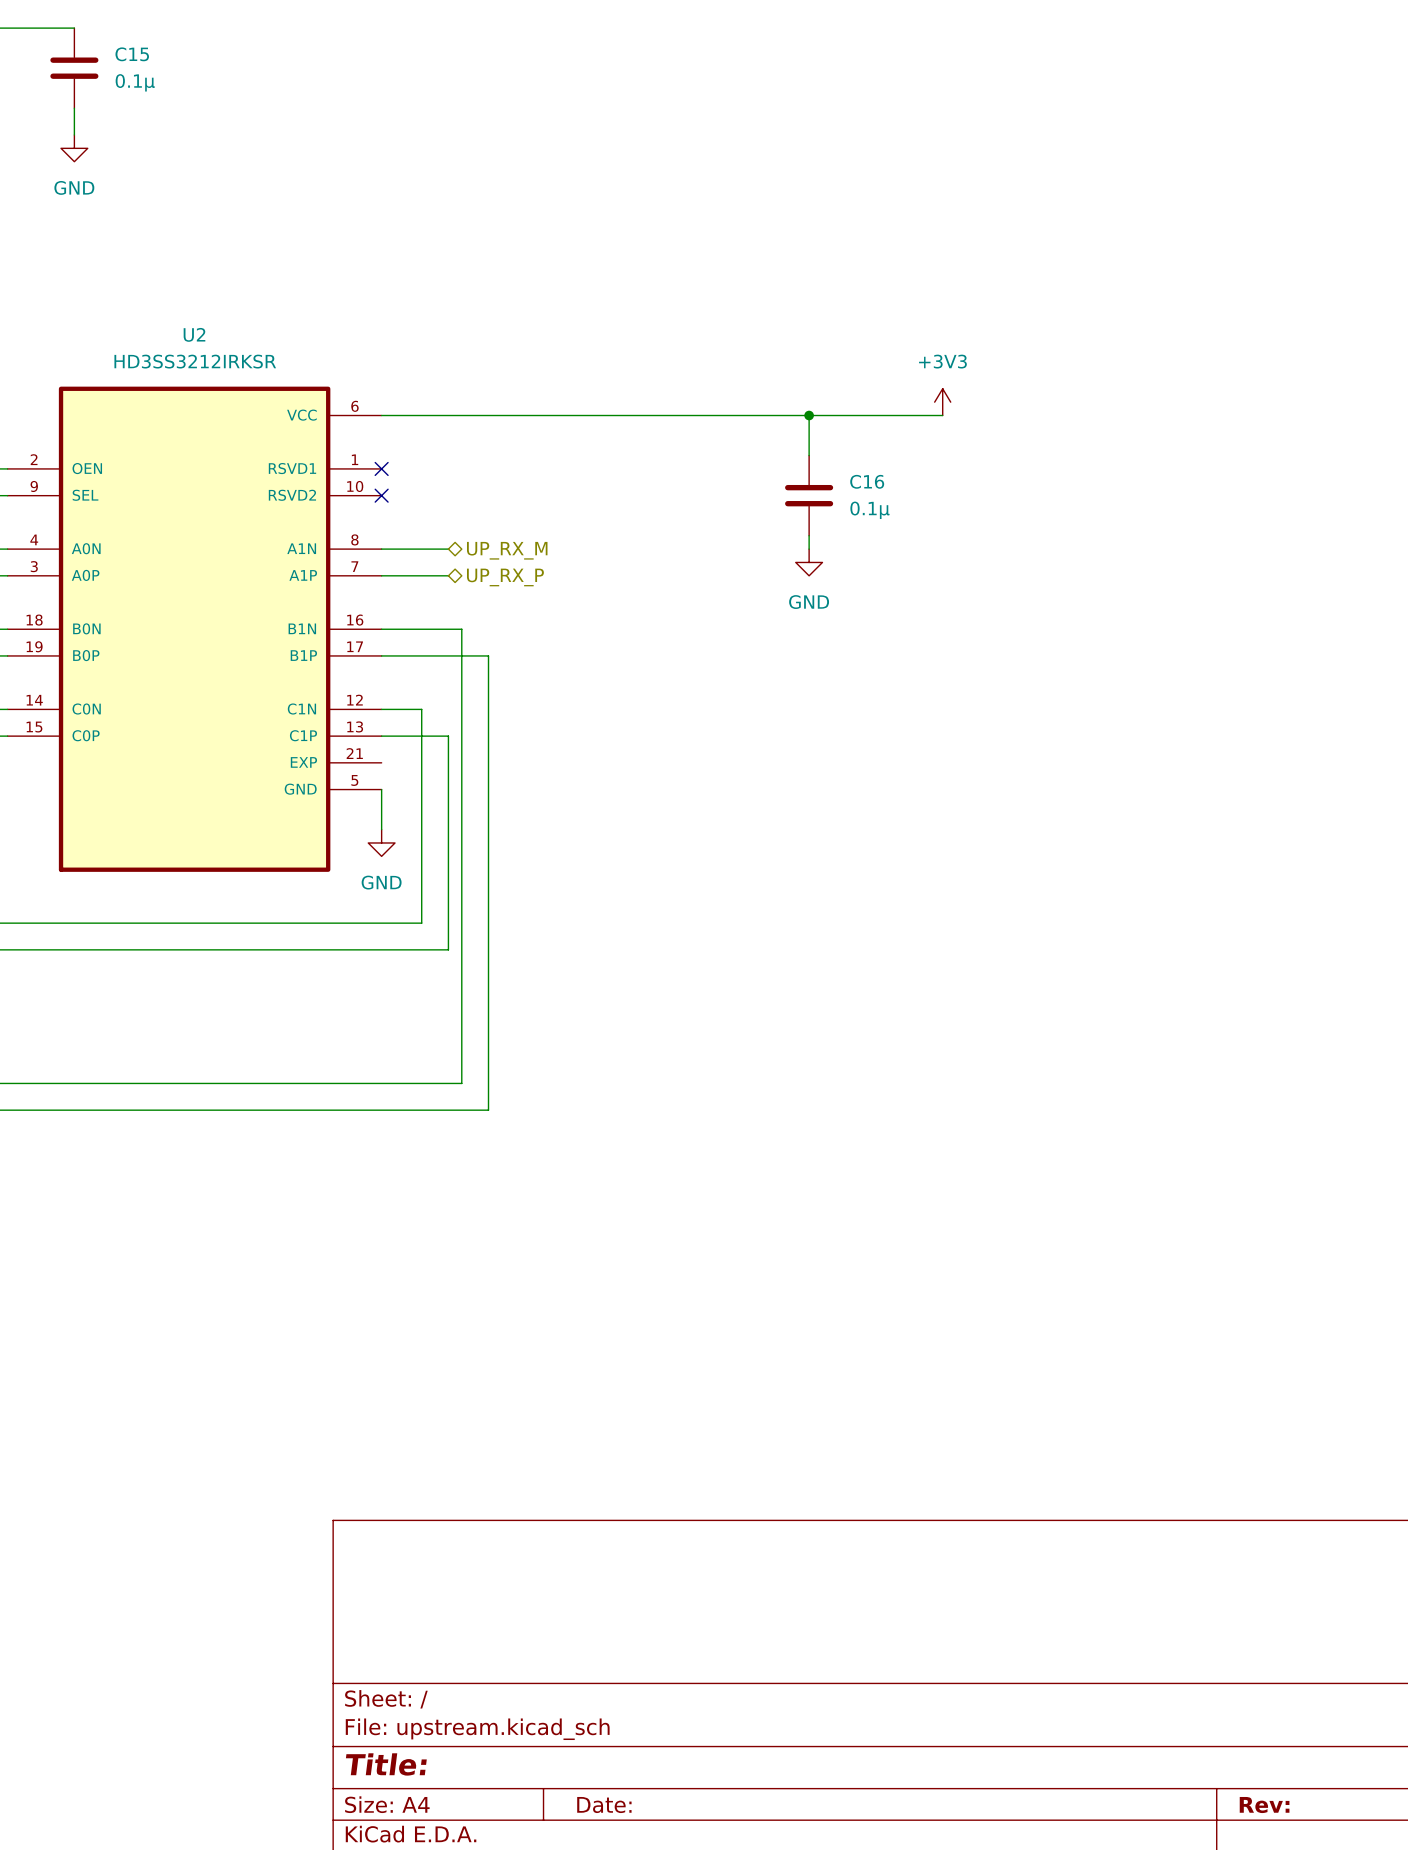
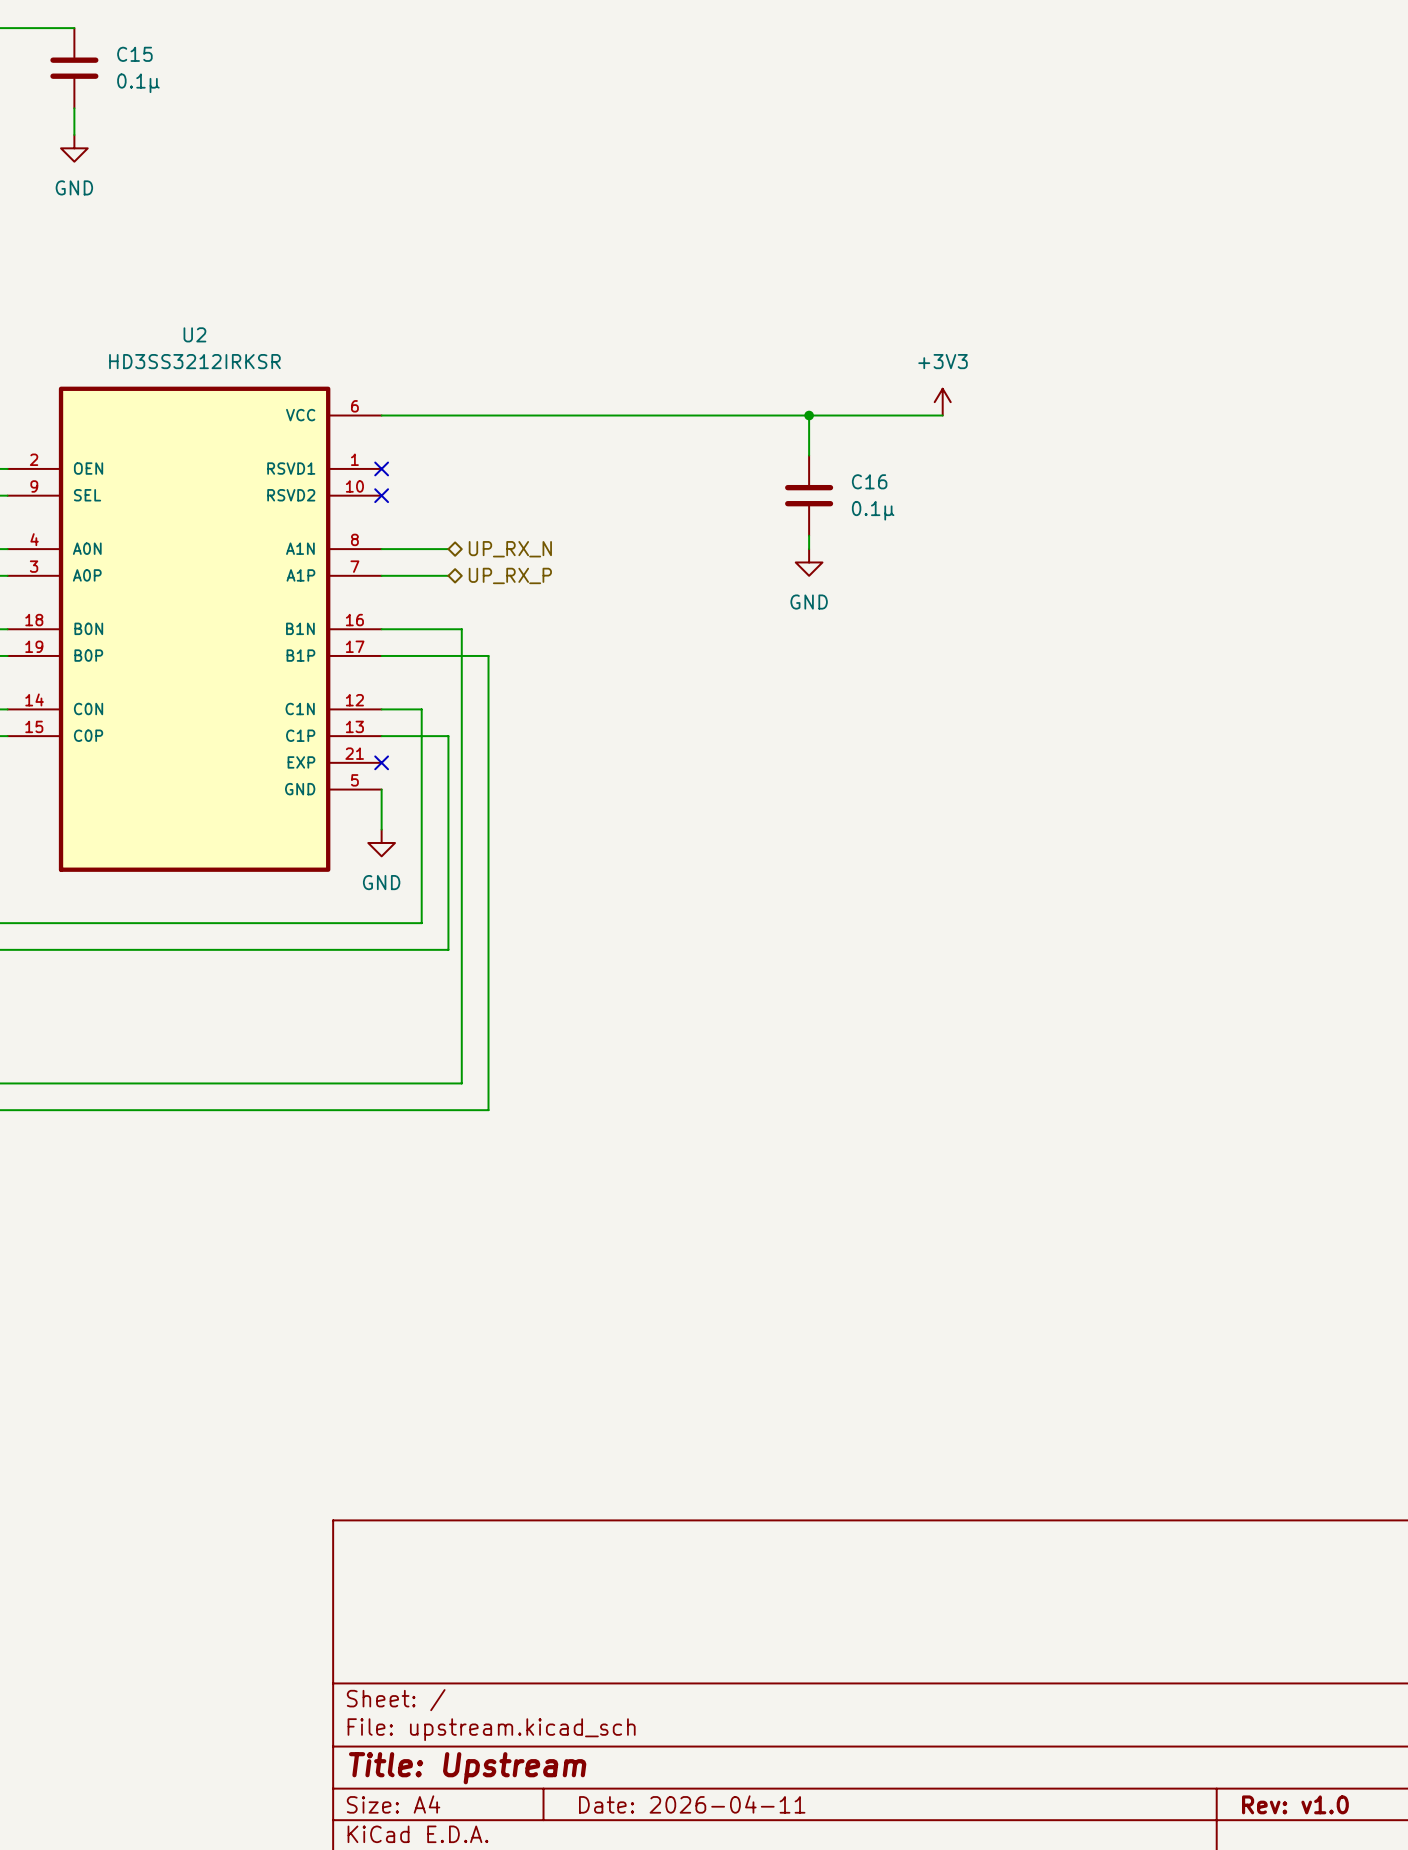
hierarchical label: UP_RX_M (507, 550) -> UP_RX_N (510, 549)
no-connect mark: none -> (381, 762)
title block: Title: (386, 1764) -> Title: Upstream (467, 1768)
title block: Date: (604, 1805) -> Date: 2026-04-11 (692, 1804)
title block: Rev: (1264, 1805) -> Rev: v1.0 (1295, 1804)

